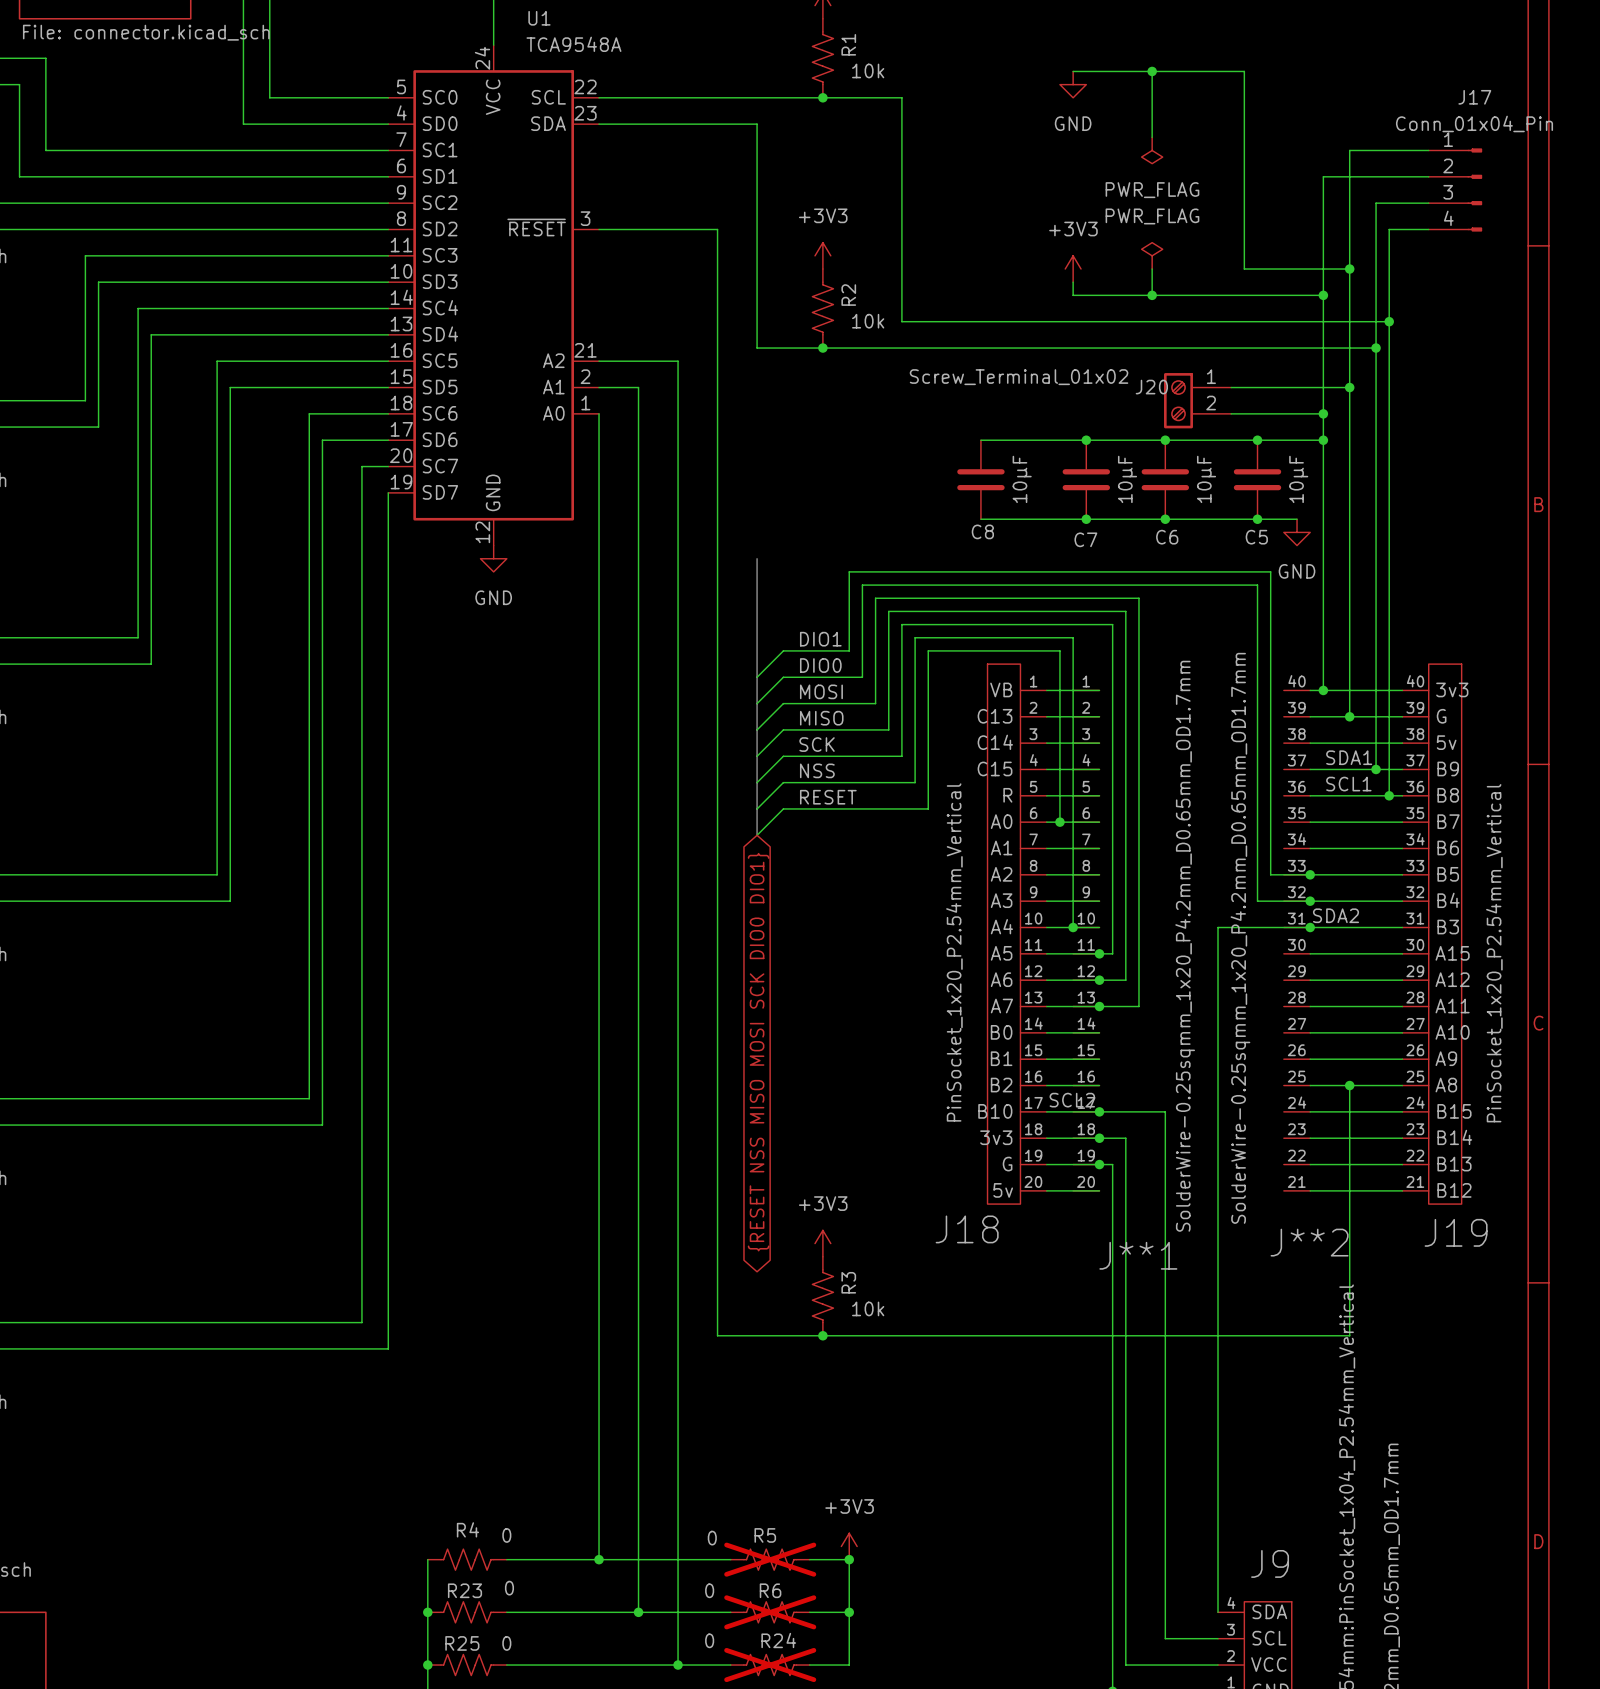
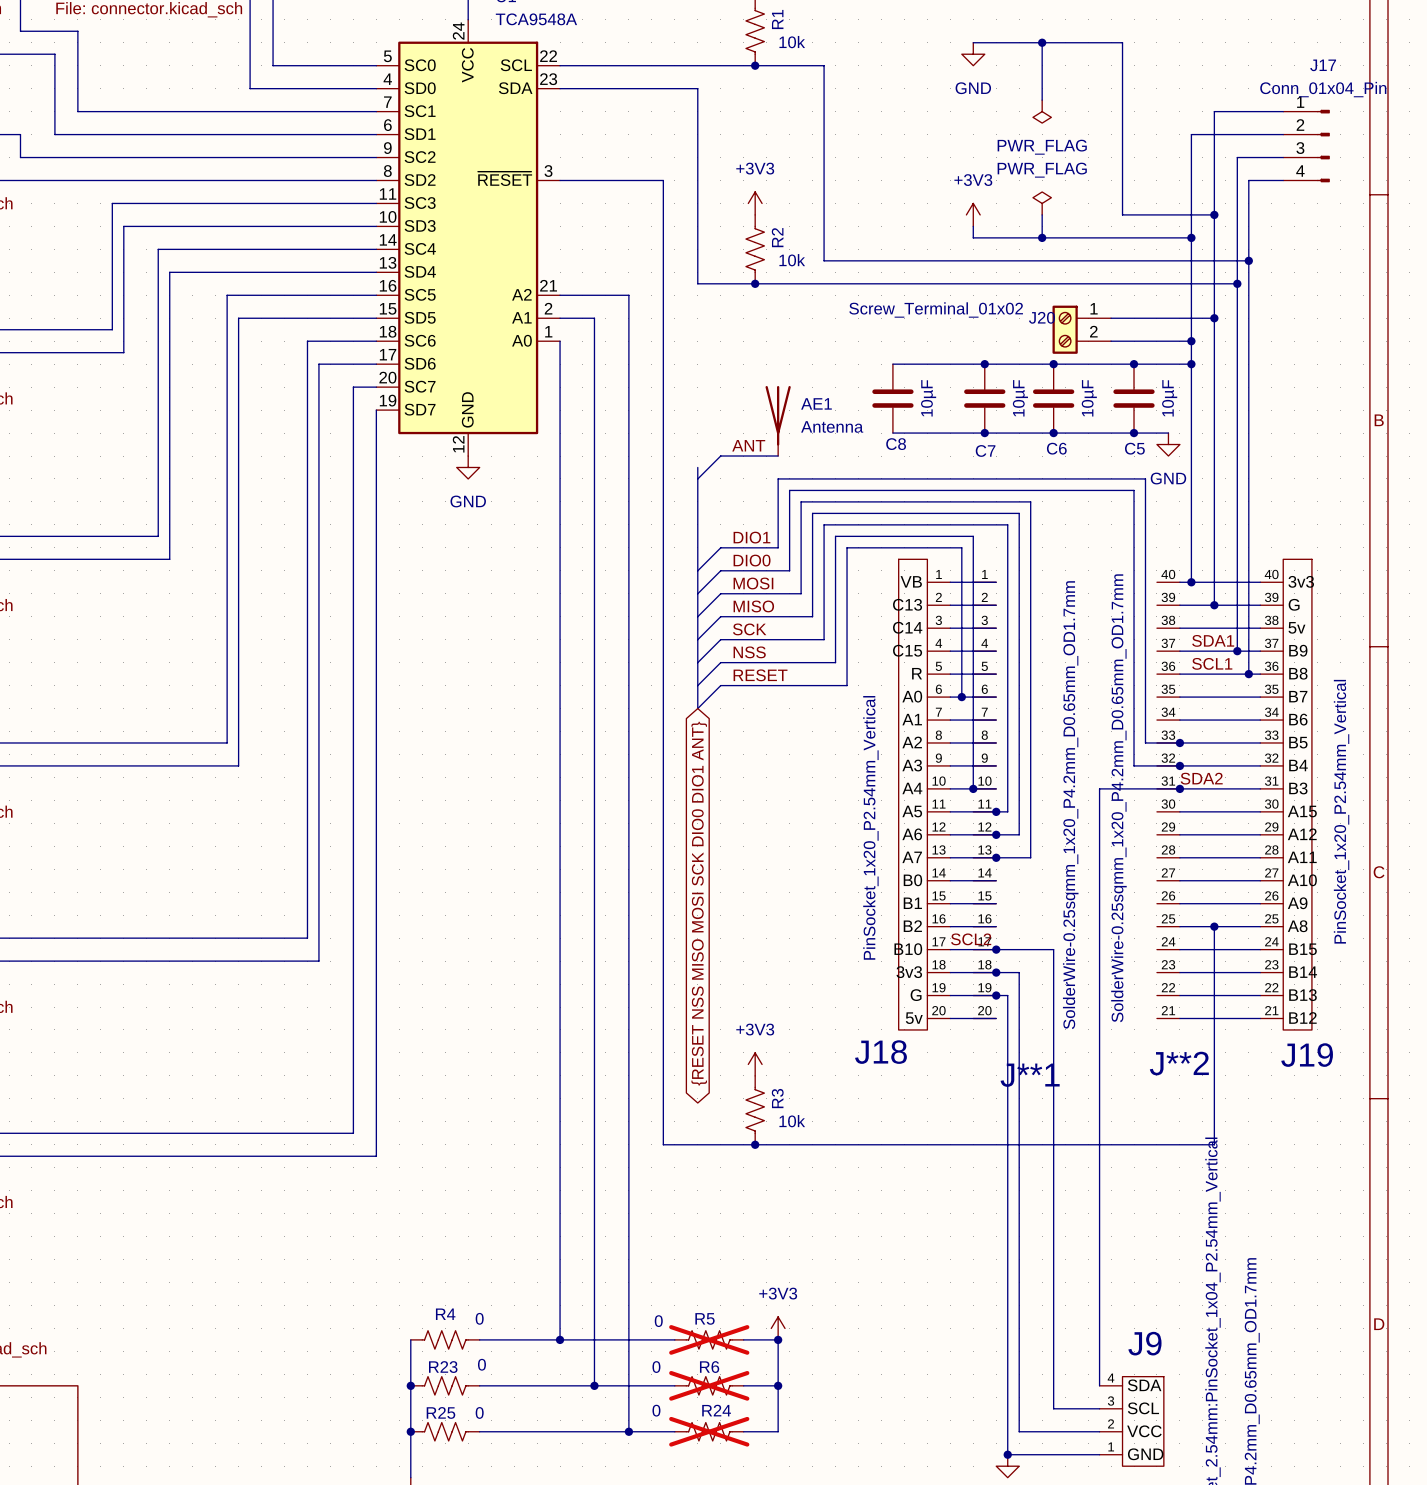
AE1: none -> Antenna (778, 420)
label: none -> ANT (748, 445)
wire: none -> (778, 456) (720, 456) (697, 478)
global label: {RESET NSS MISO MOSI SCK DIO0 DIO1} (758, 1052) -> {RESET NSS MISO MOSI SCK DIO0 DIO1 ANT} (699, 903)

